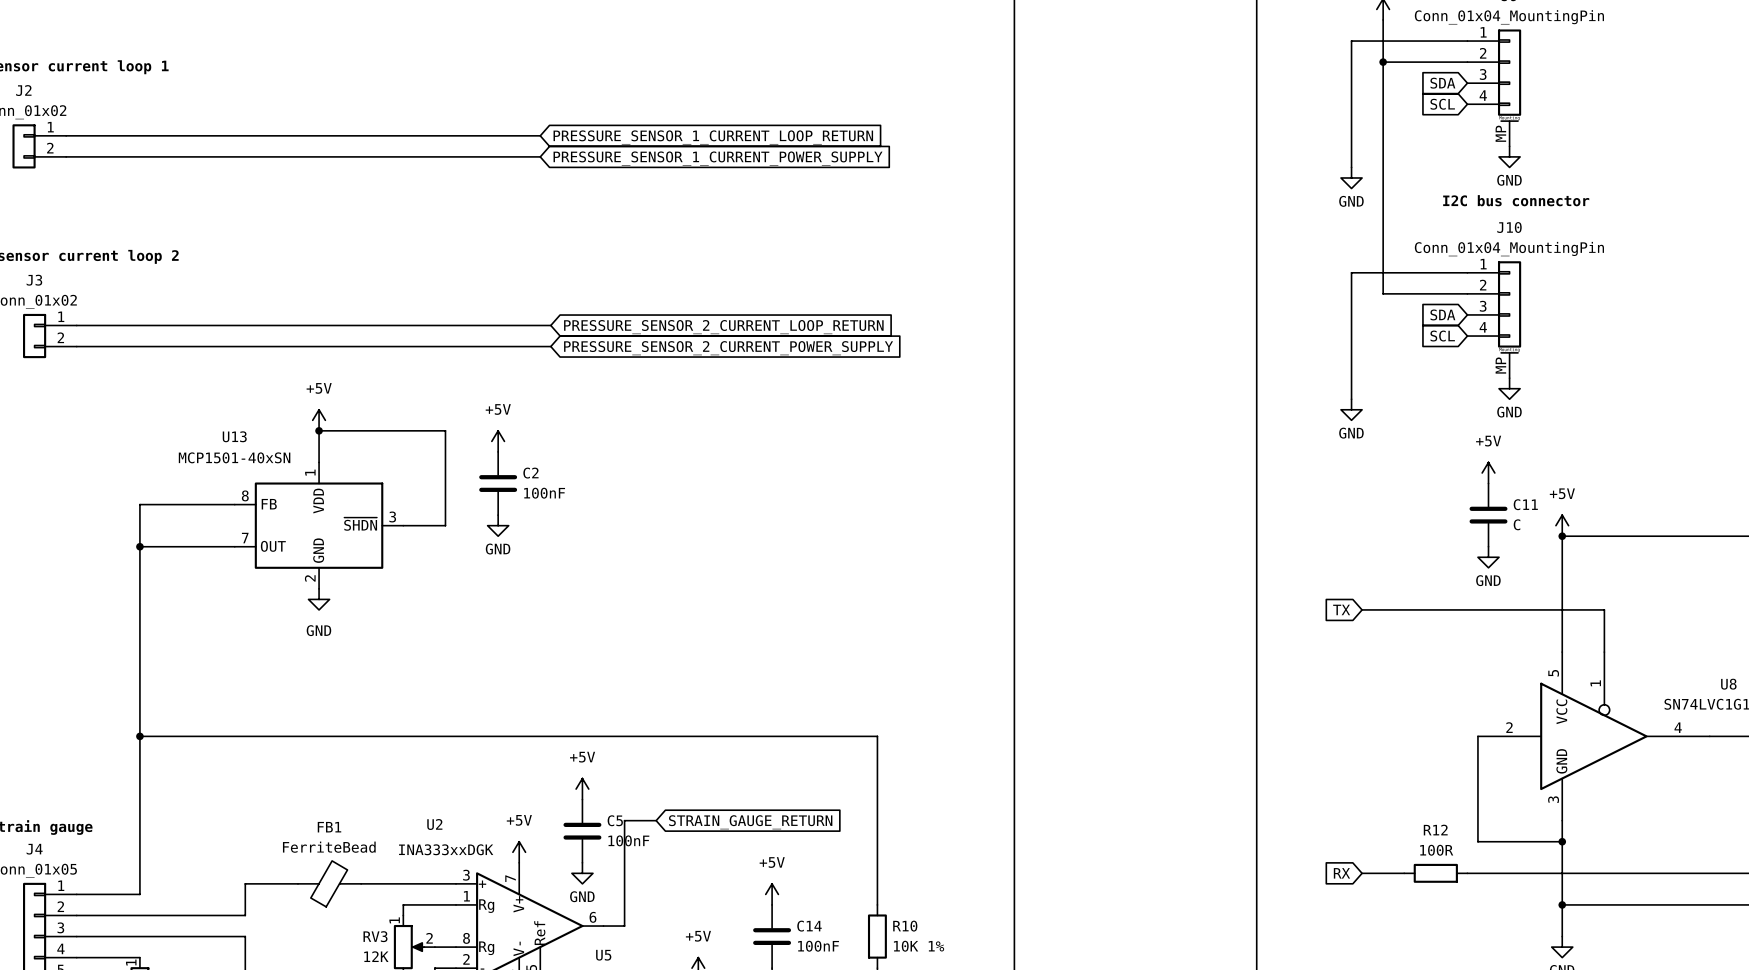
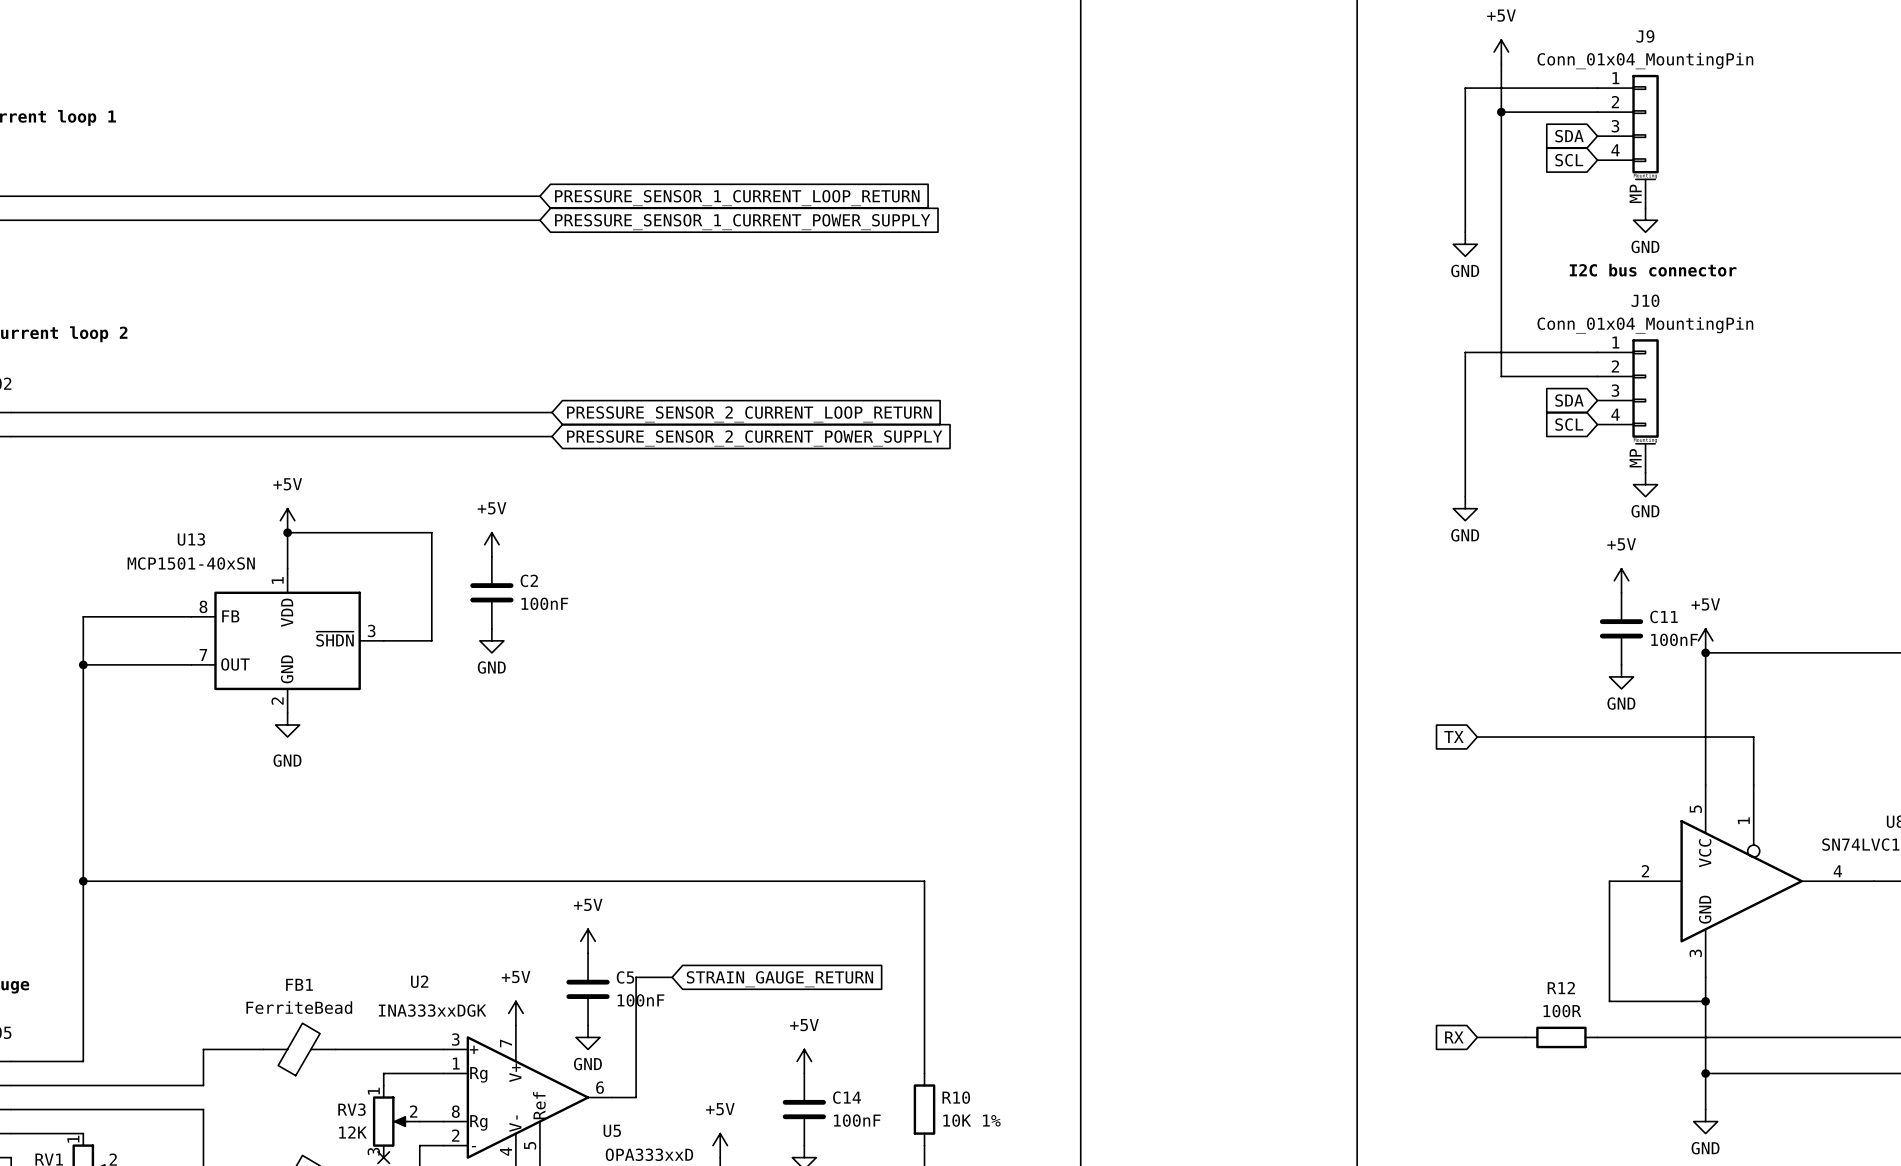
C11 value: C (1517, 524) -> 100nF (1674, 639)

